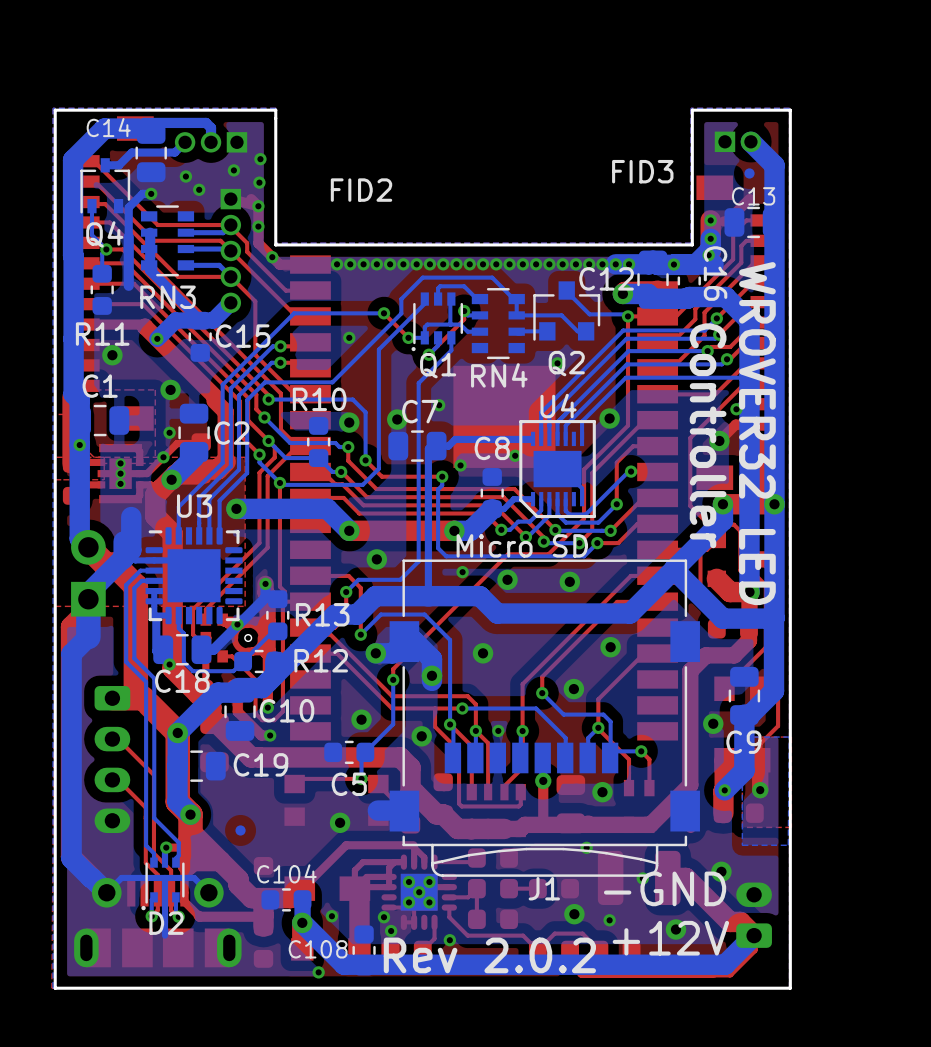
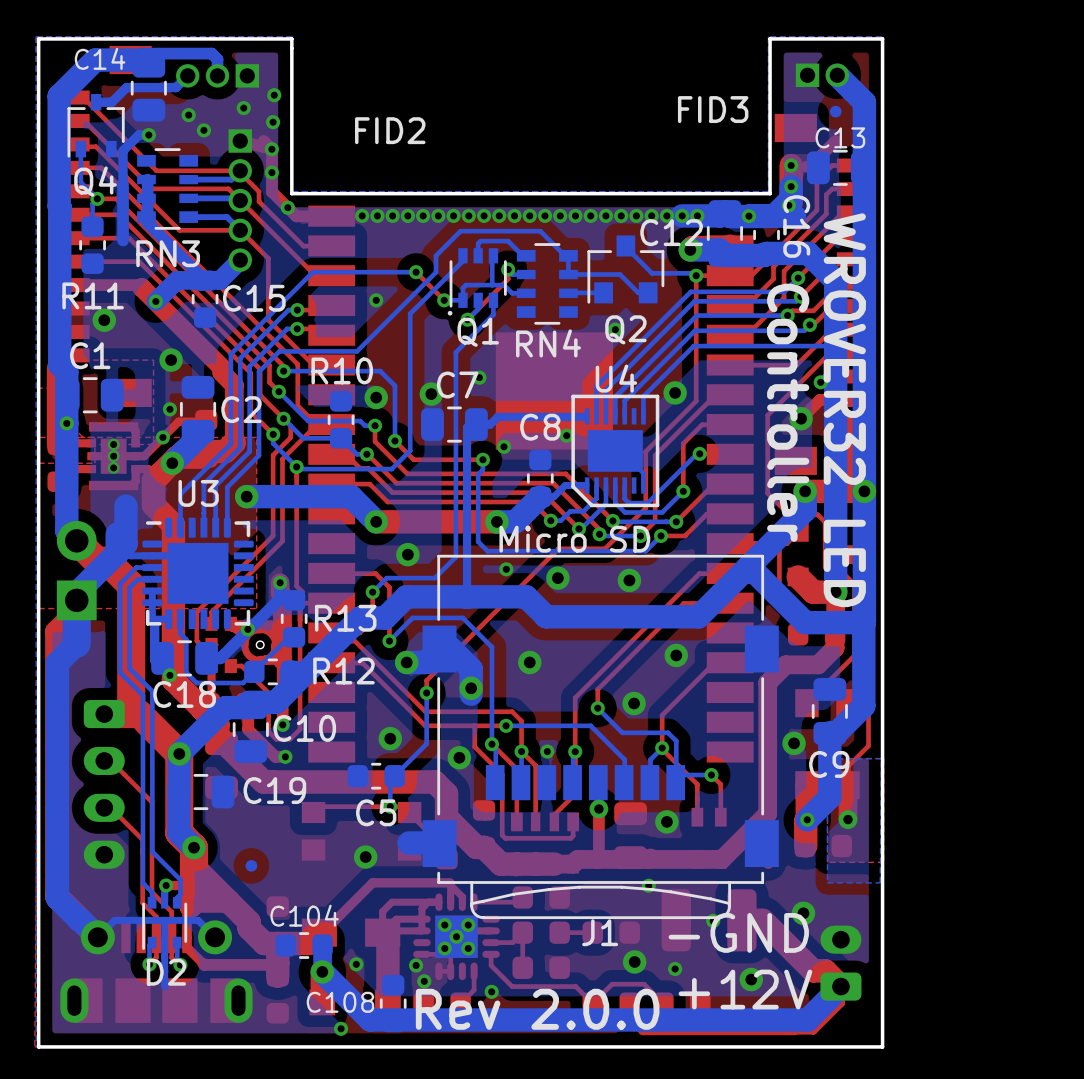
drawing: [141, 905, 146, 911] -> none
text: Rev 2.0.2 (489, 955) -> Rev 2.0.0 (537, 1009)

